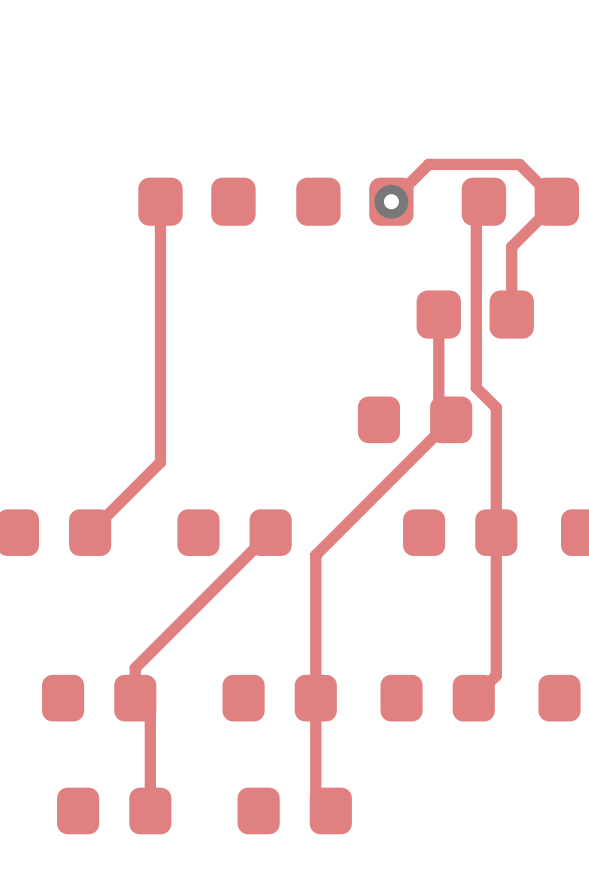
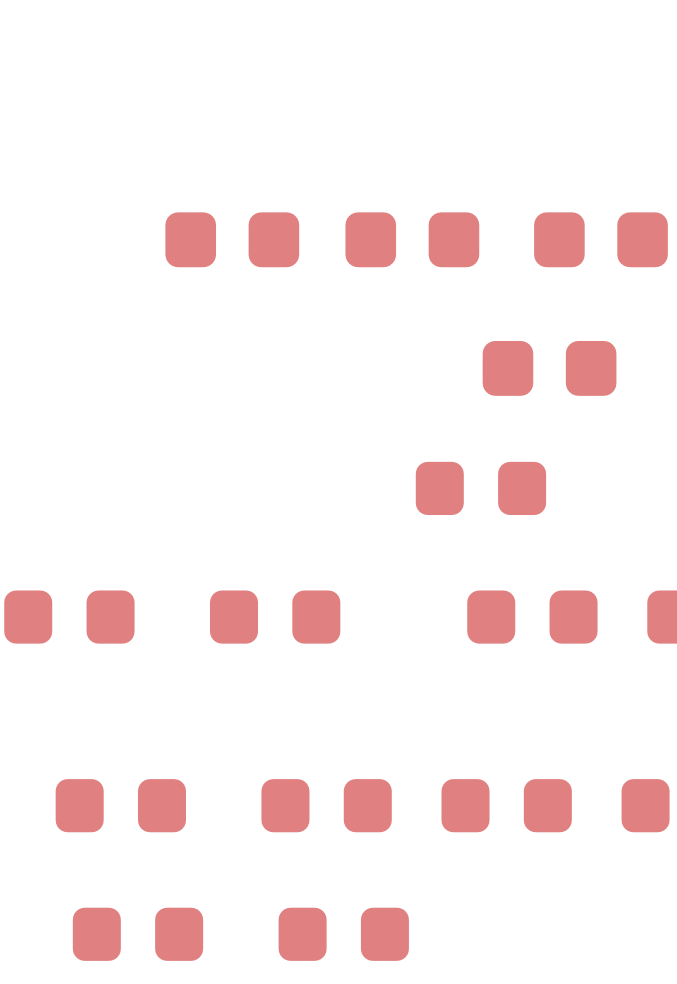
top track: (160, 201) (160, 462) (90, 532) -> none
top track: (391, 201) (428, 164) (519, 164) (556, 201) (511, 246) (511, 314) -> none
via: (391, 201) -> none
top track: (483, 201) (476, 209) (476, 387) (496, 407) (496, 675) (473, 698) -> none
top track: (438, 314) (438, 407) (451, 419) (315, 555) (315, 795) (330, 810) -> none
top track: (270, 532) (135, 668) (135, 698) (150, 713) (150, 810) -> none

